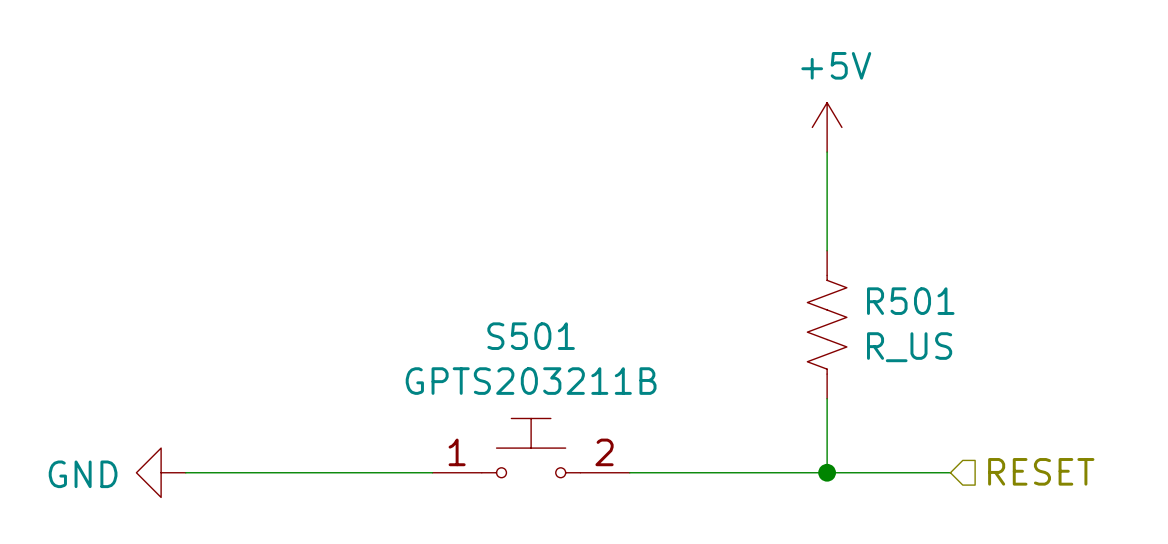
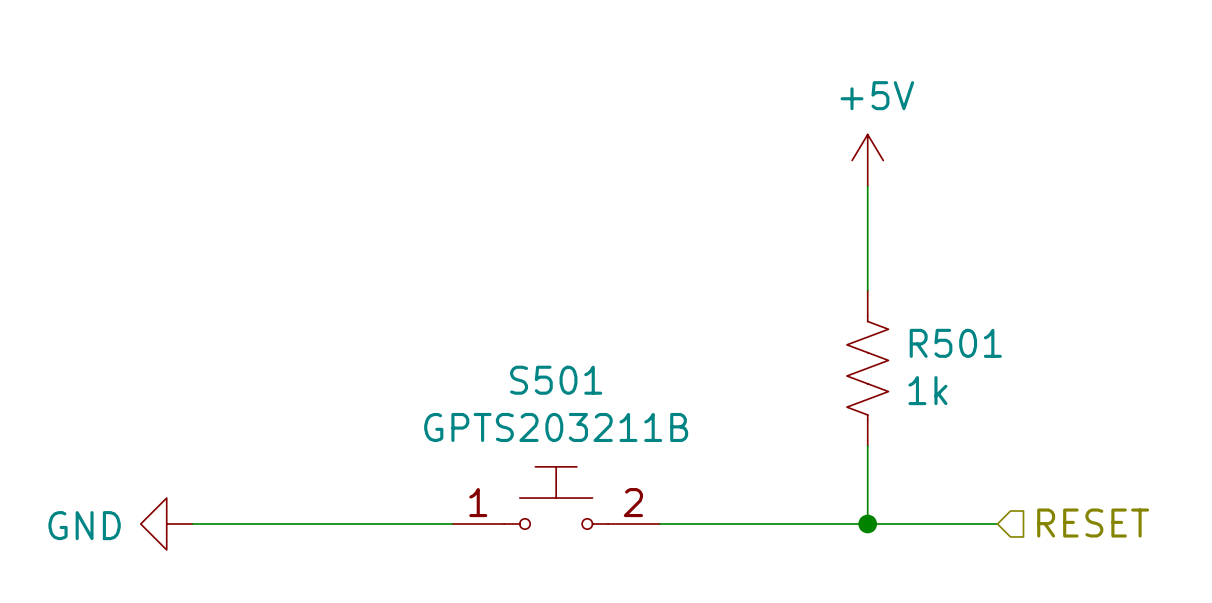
R501 value: R_US (909, 347) -> 1k (927, 390)

